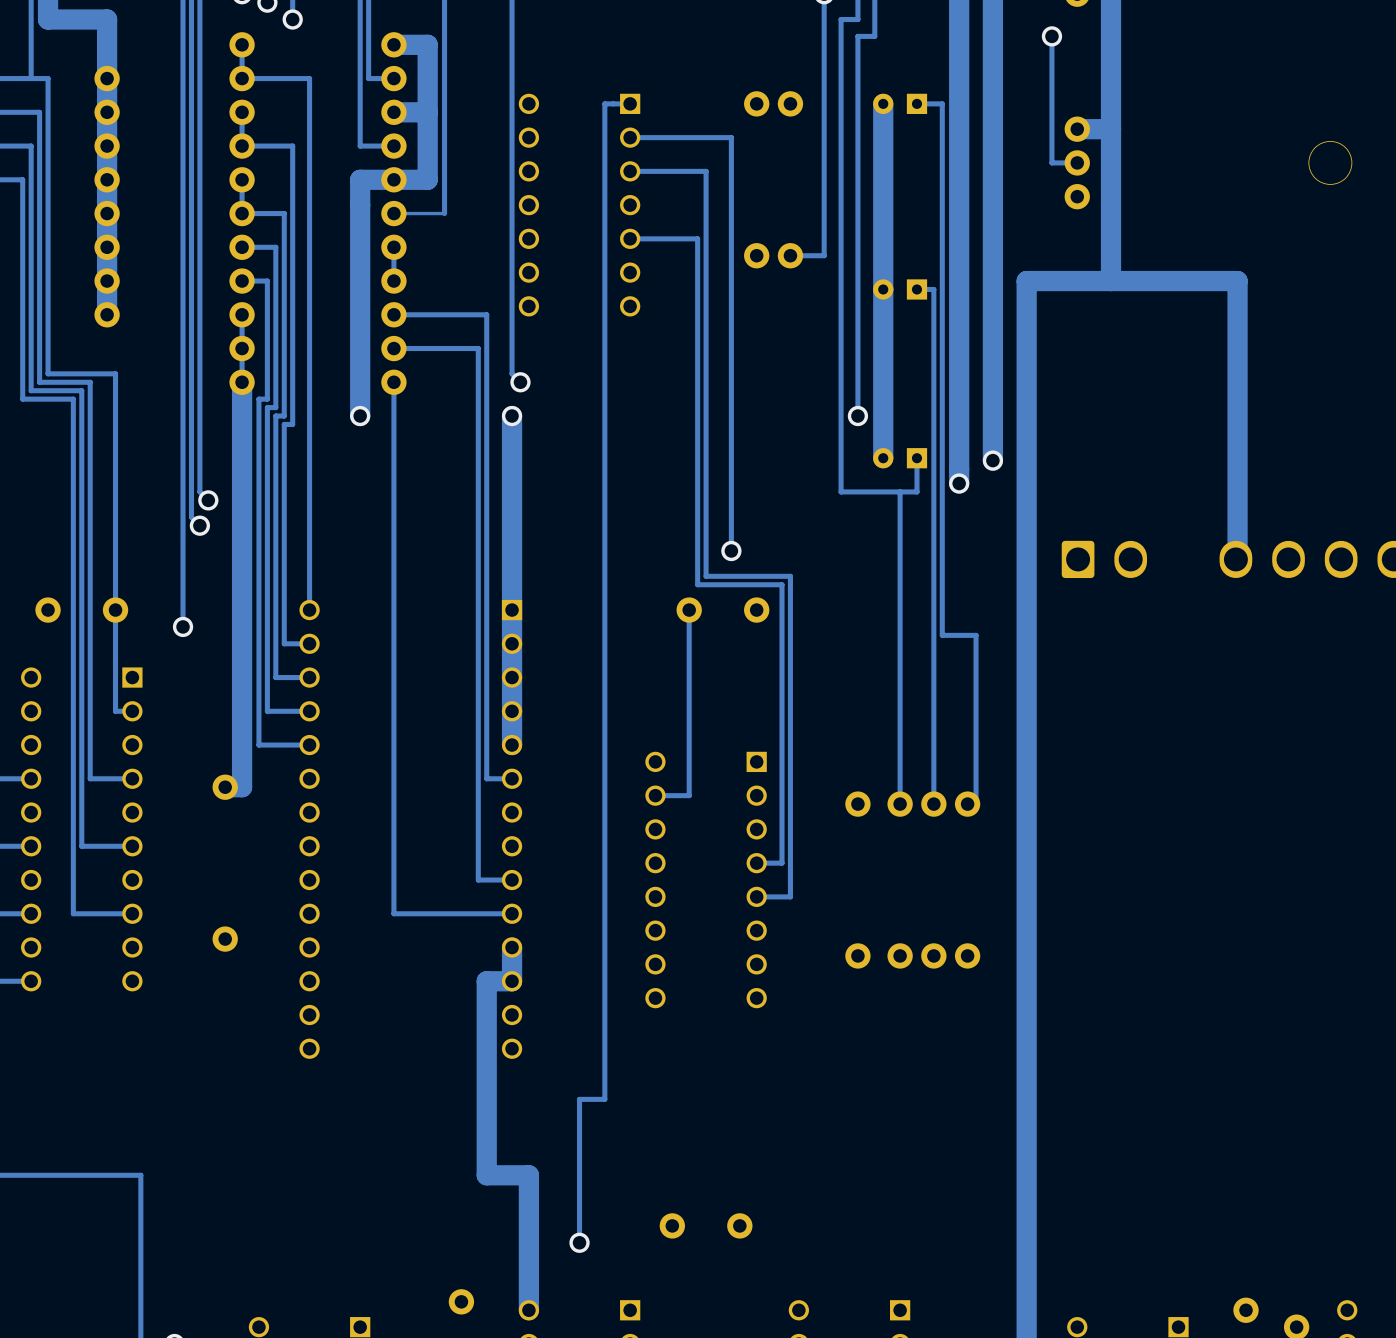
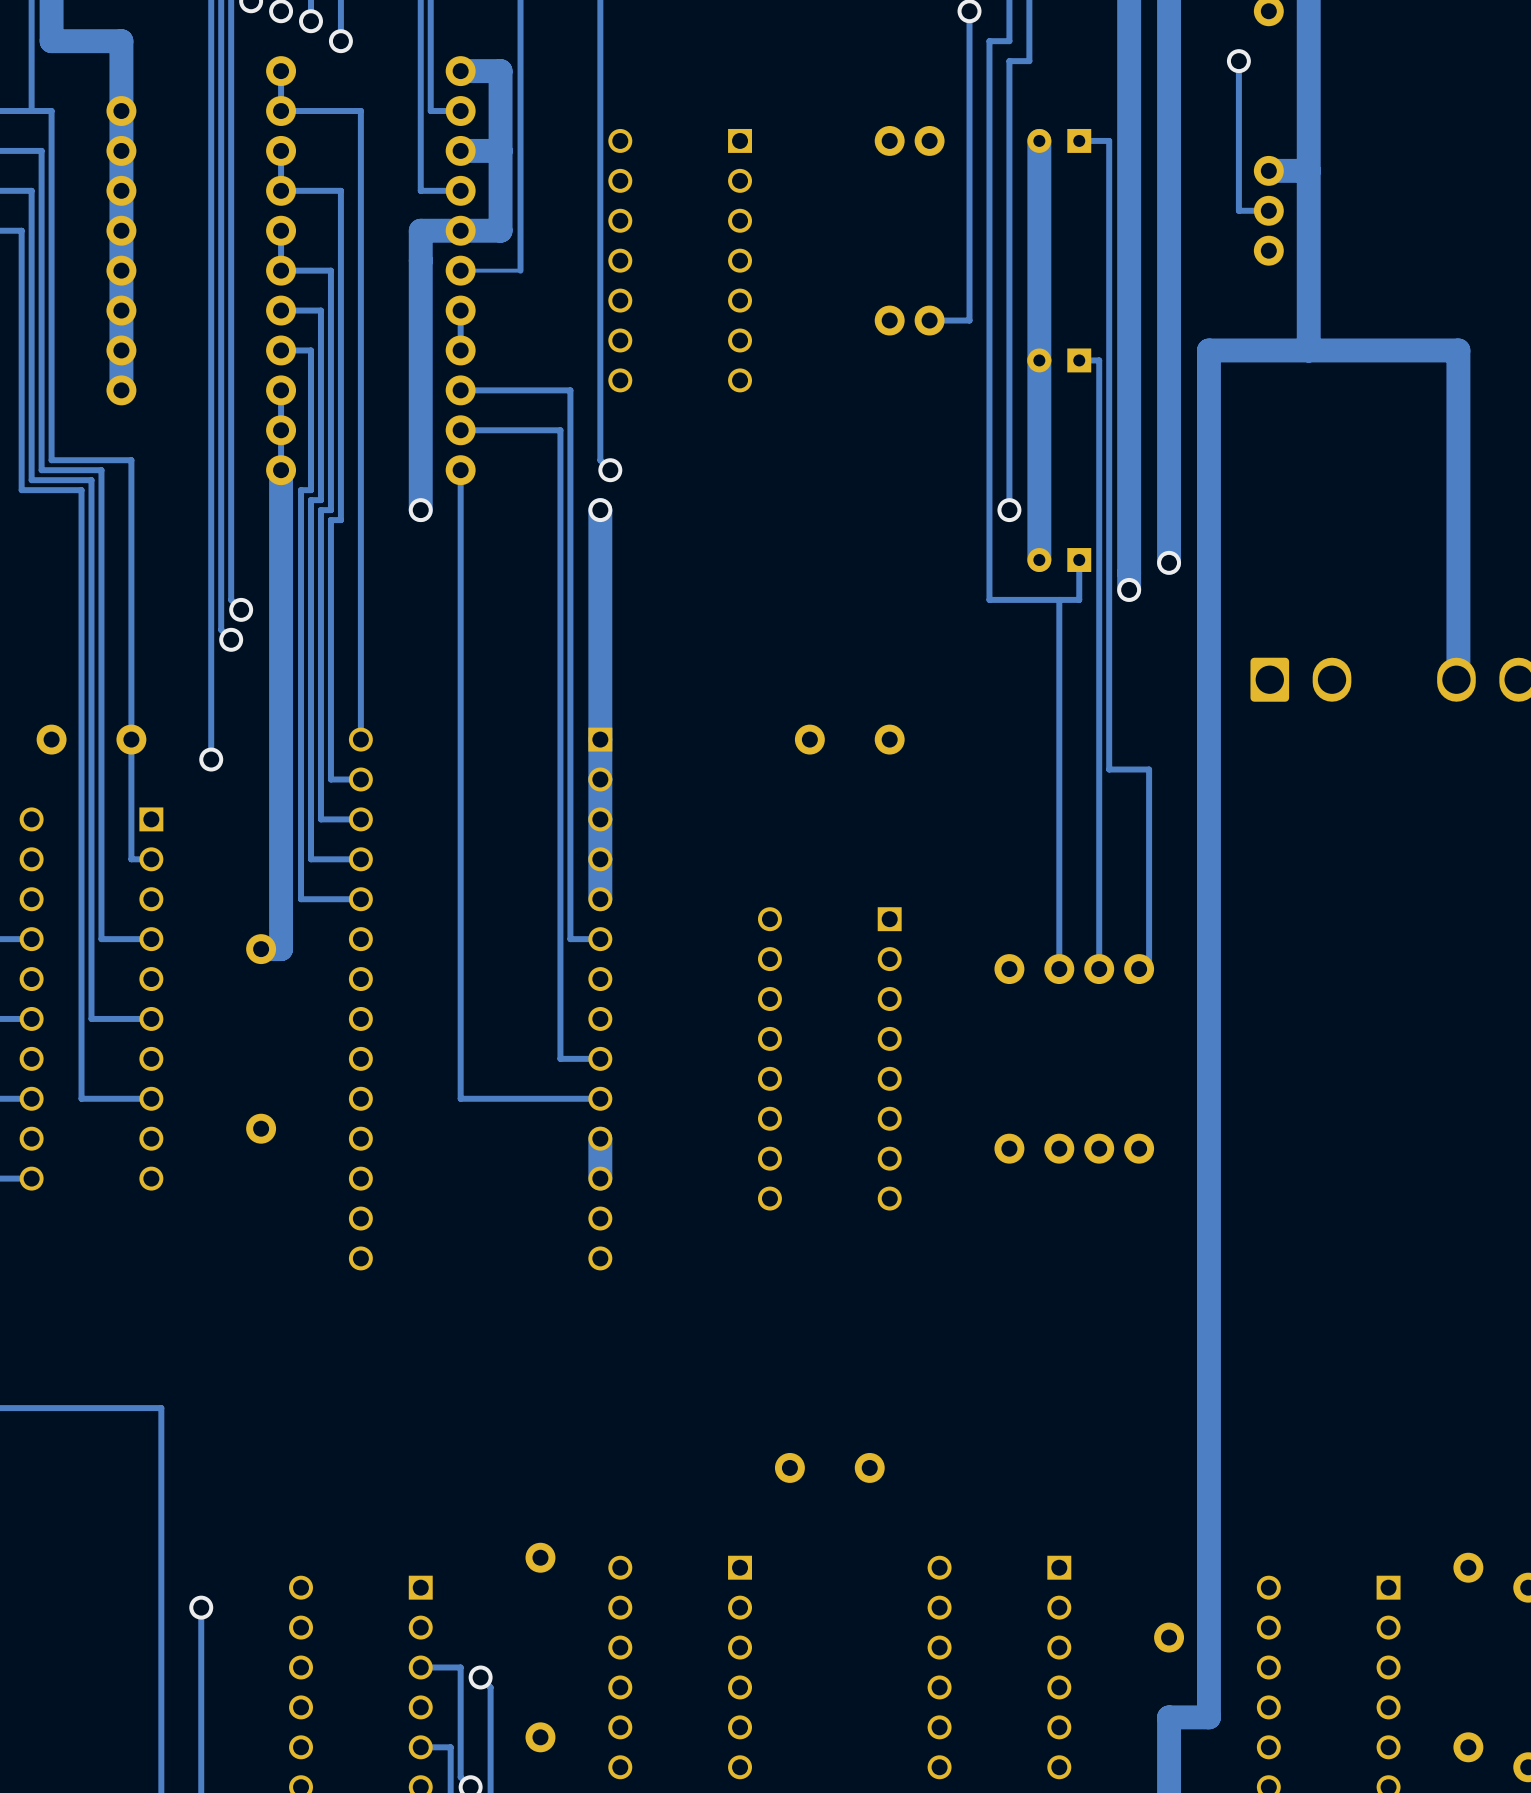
track: (630, 103) (604, 103) (604, 1099) (579, 1099) (579, 1242) -> none
track: (630, 137) (731, 137) (731, 551) -> none
track: (630, 171) (706, 171) (706, 576) (790, 576) (790, 896) (756, 896) -> none
track: (630, 238) (697, 238) (697, 584) (782, 584) (782, 863) (756, 863) -> none
via: (731, 551) -> none
track: (689, 610) (689, 795) (655, 795) -> none
track: (512, 981) (486, 981) (486, 1175) (528, 1175) (528, 1310) -> none
via: (579, 1242) -> none

